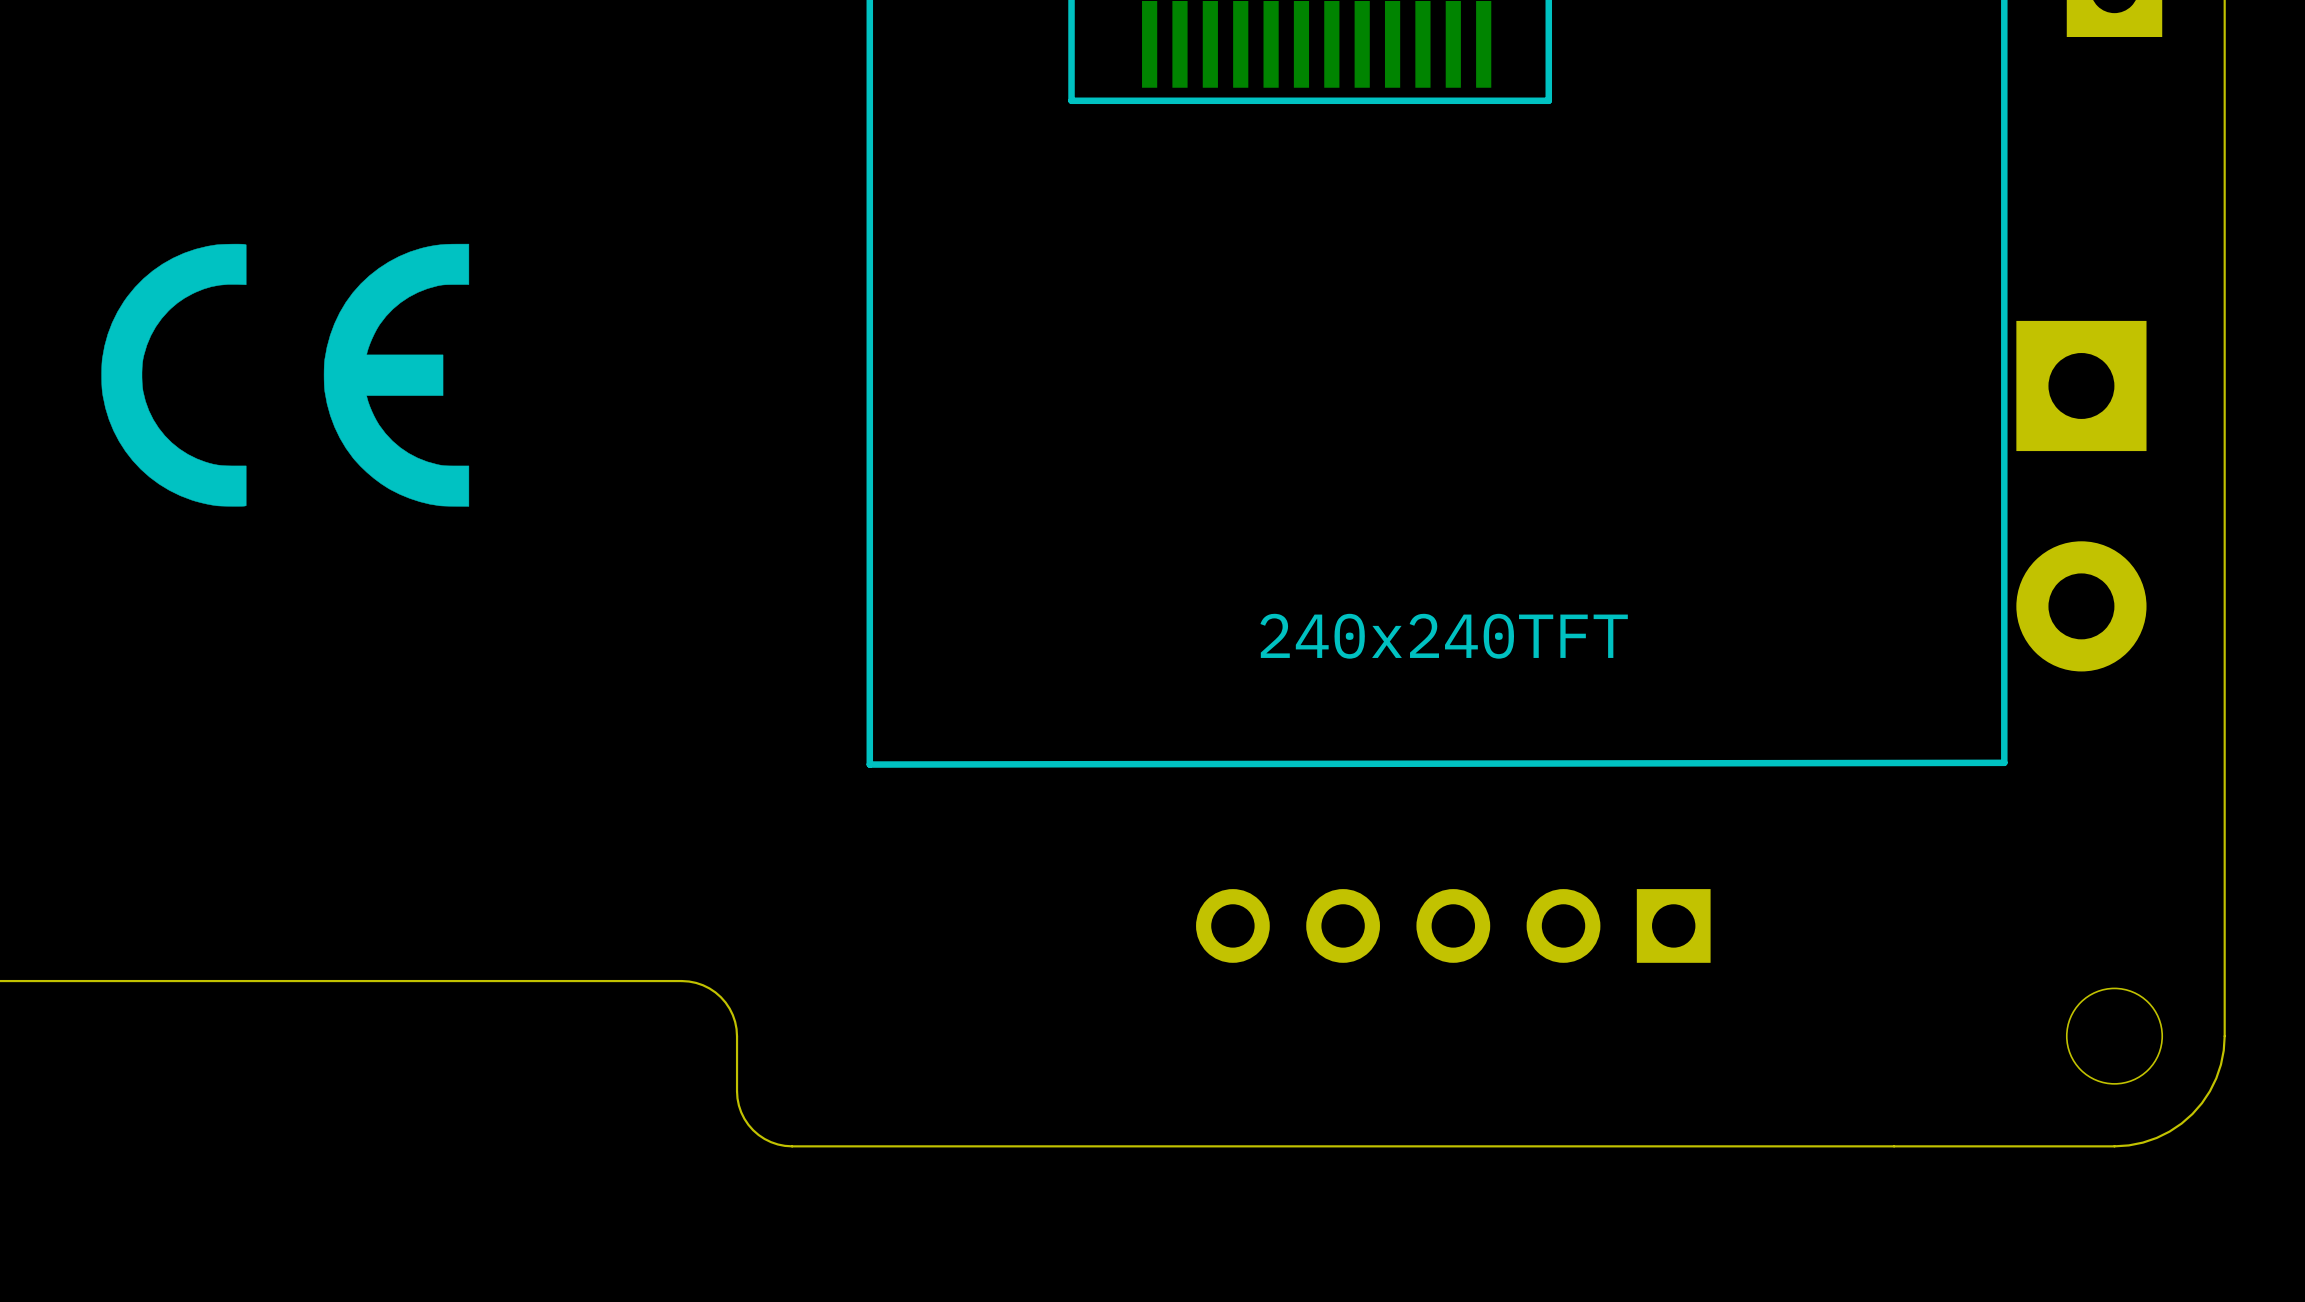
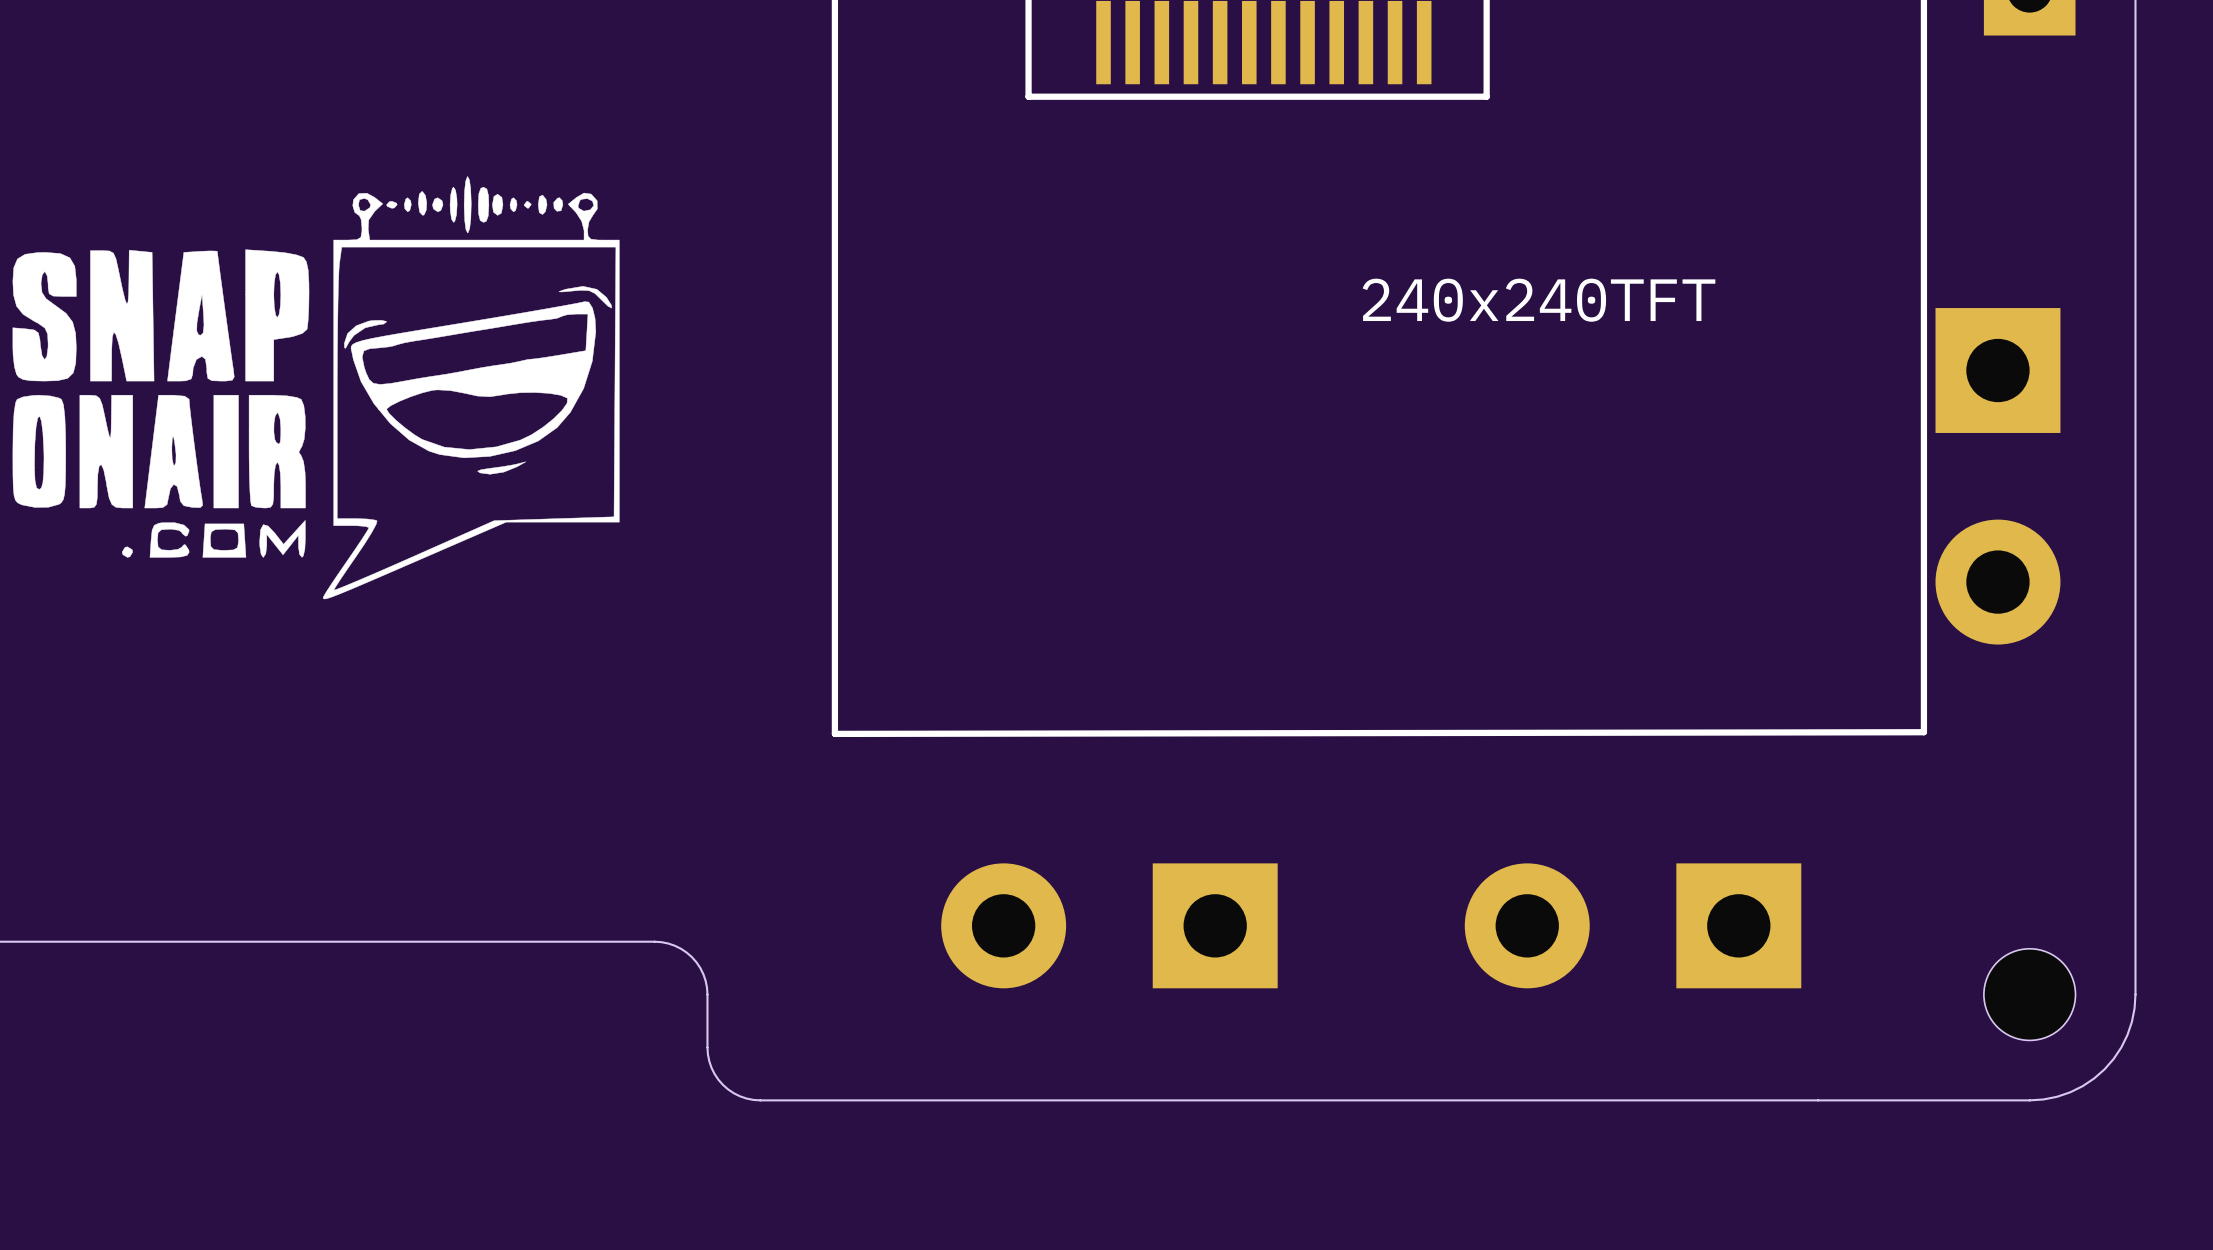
drawing: none -> [12, 176, 620, 600]
drawing: [101, 243, 470, 507] -> none
part value position: 240x240TFT (1444, 636) -> 240x240TFT (1539, 300)
part: (1453, 925) -> none
part: none -> (1109, 925)
part: none -> (1633, 925)

